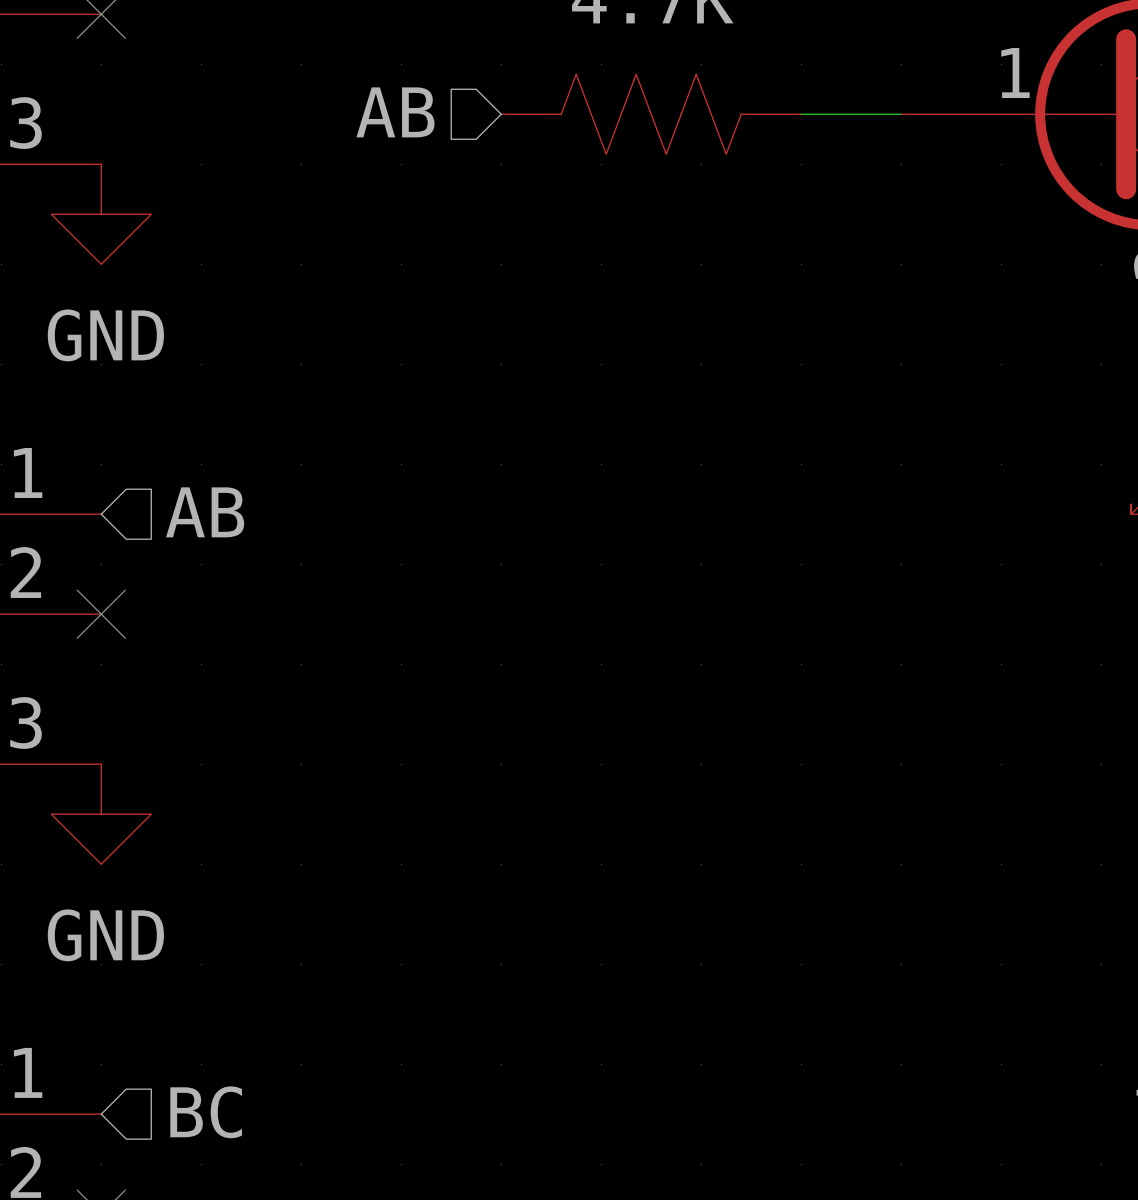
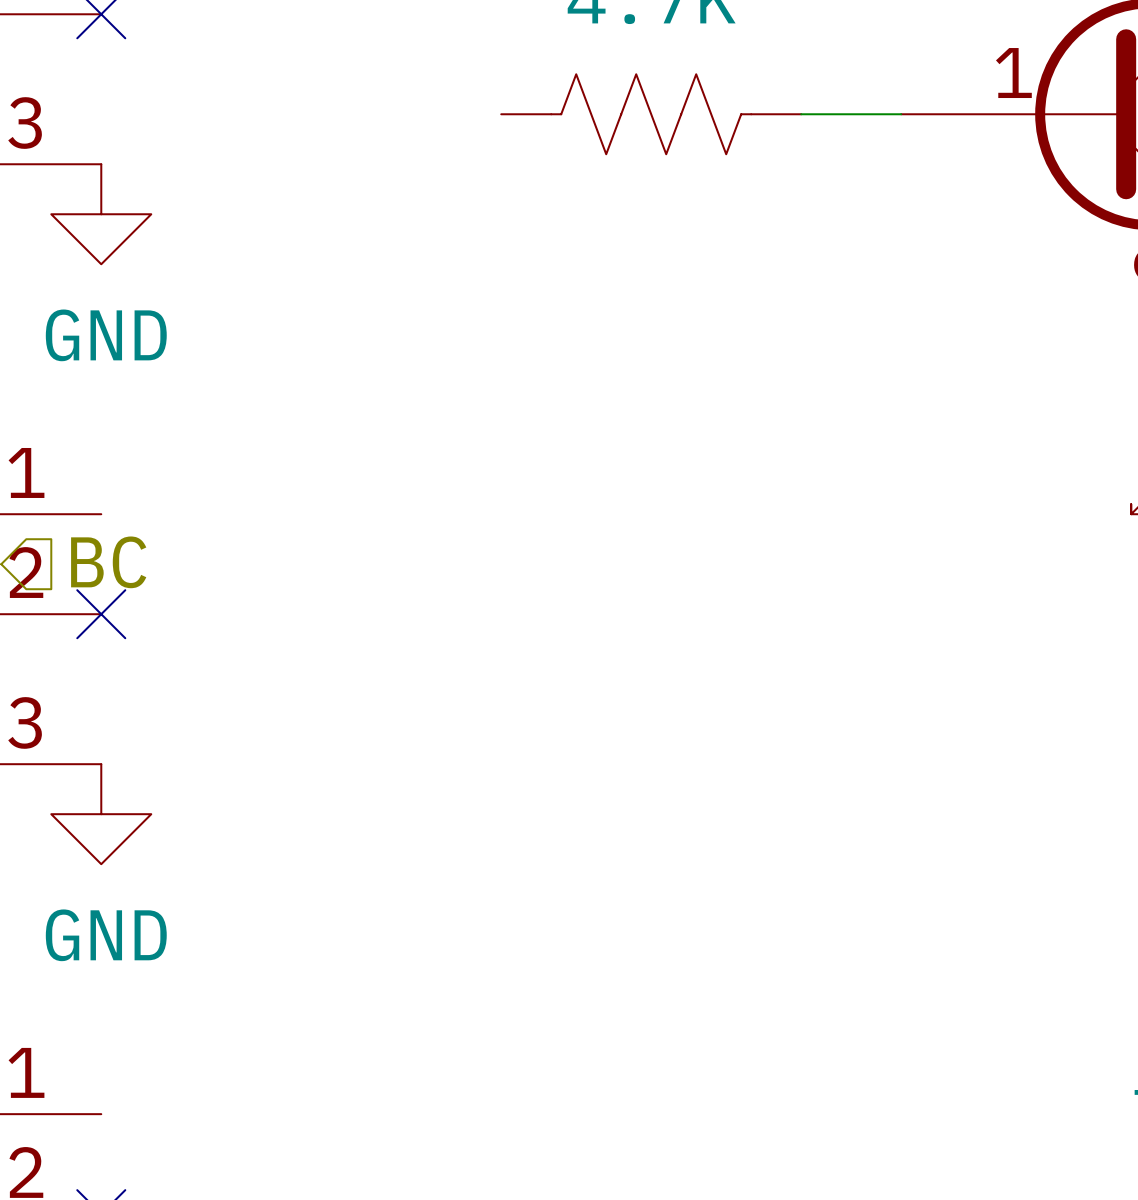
hierarchical label: AB (395, 112) -> none
hierarchical label: AB (205, 512) -> none
hierarchical label position: BC (206, 1112) -> BC (108, 562)

